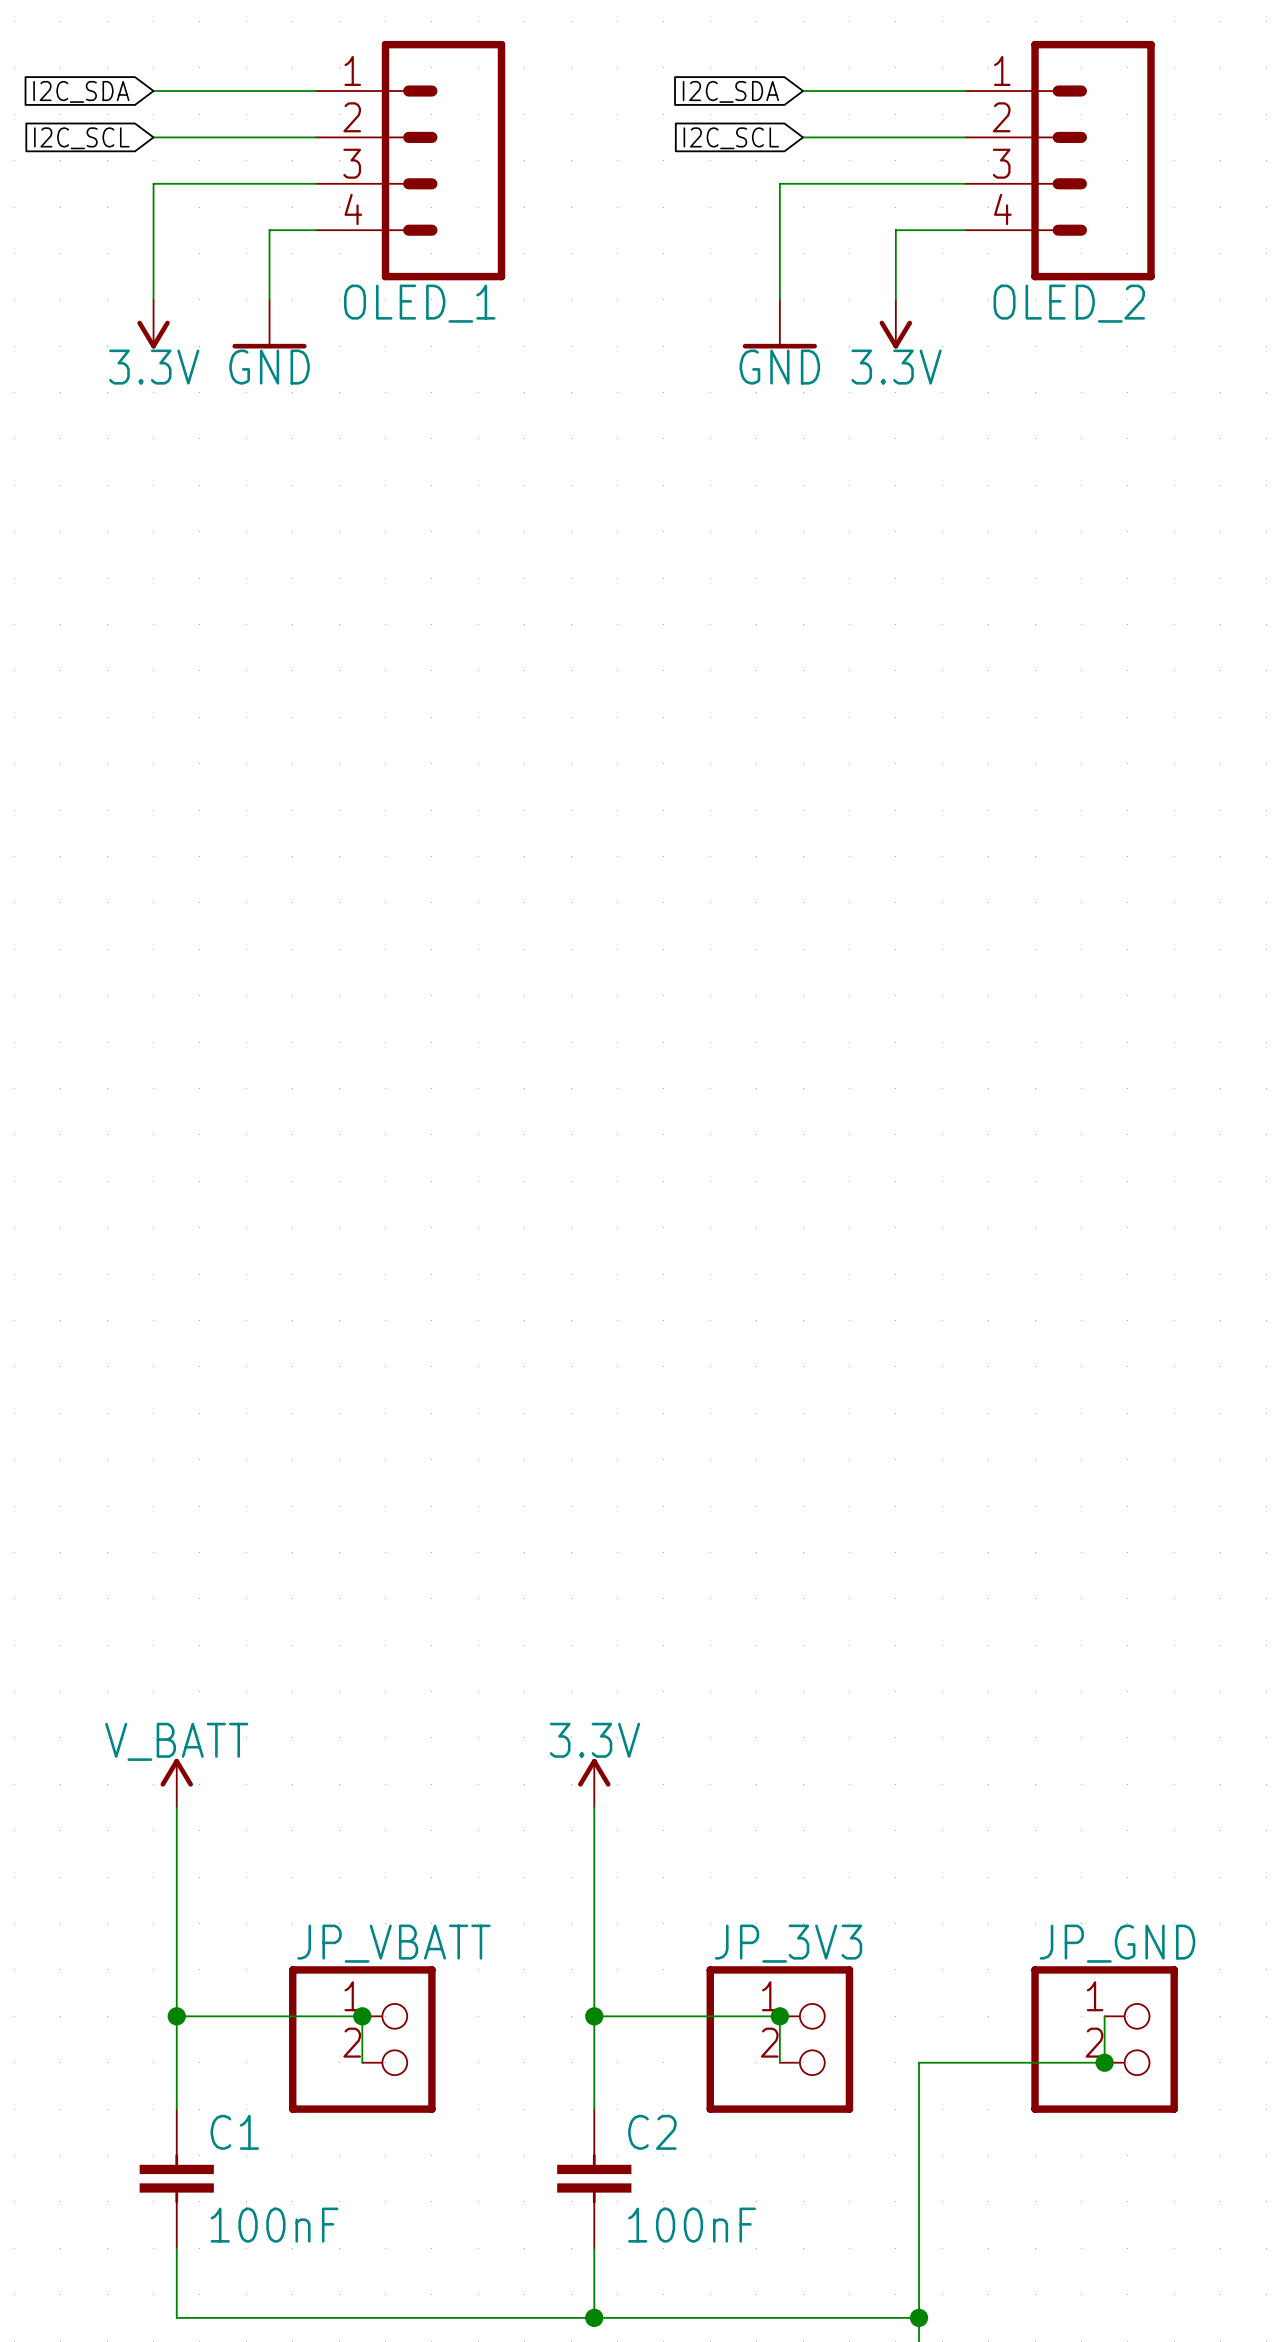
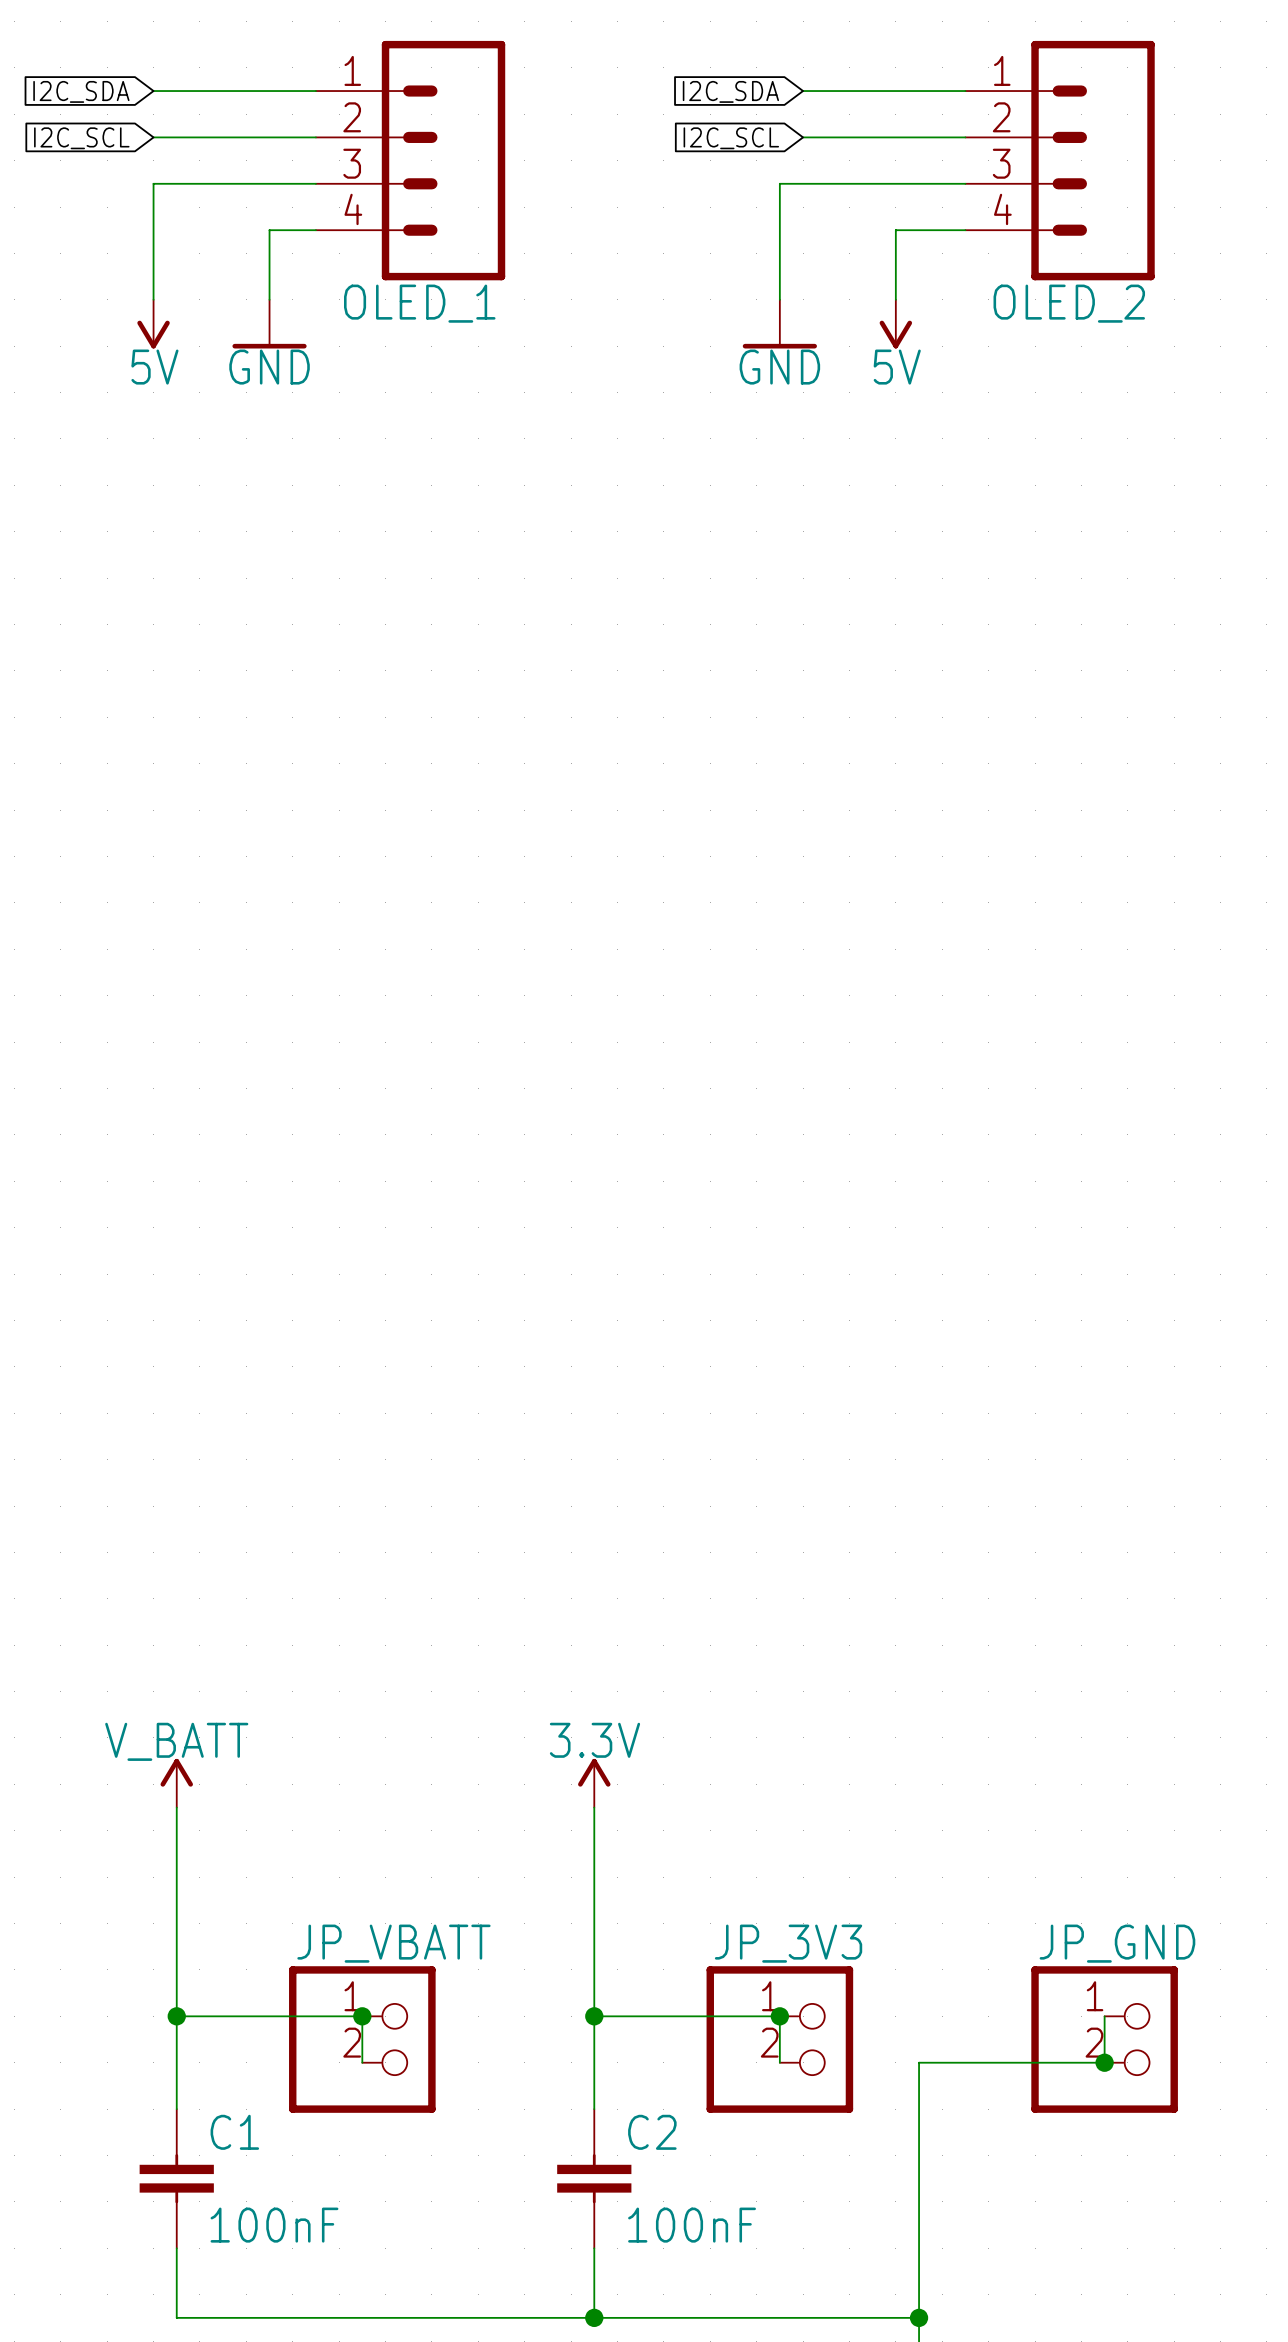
power symbol: 3.3V (153, 324) -> 5V (153, 324)
power symbol: 3.3V (895, 324) -> 5V (895, 324)

